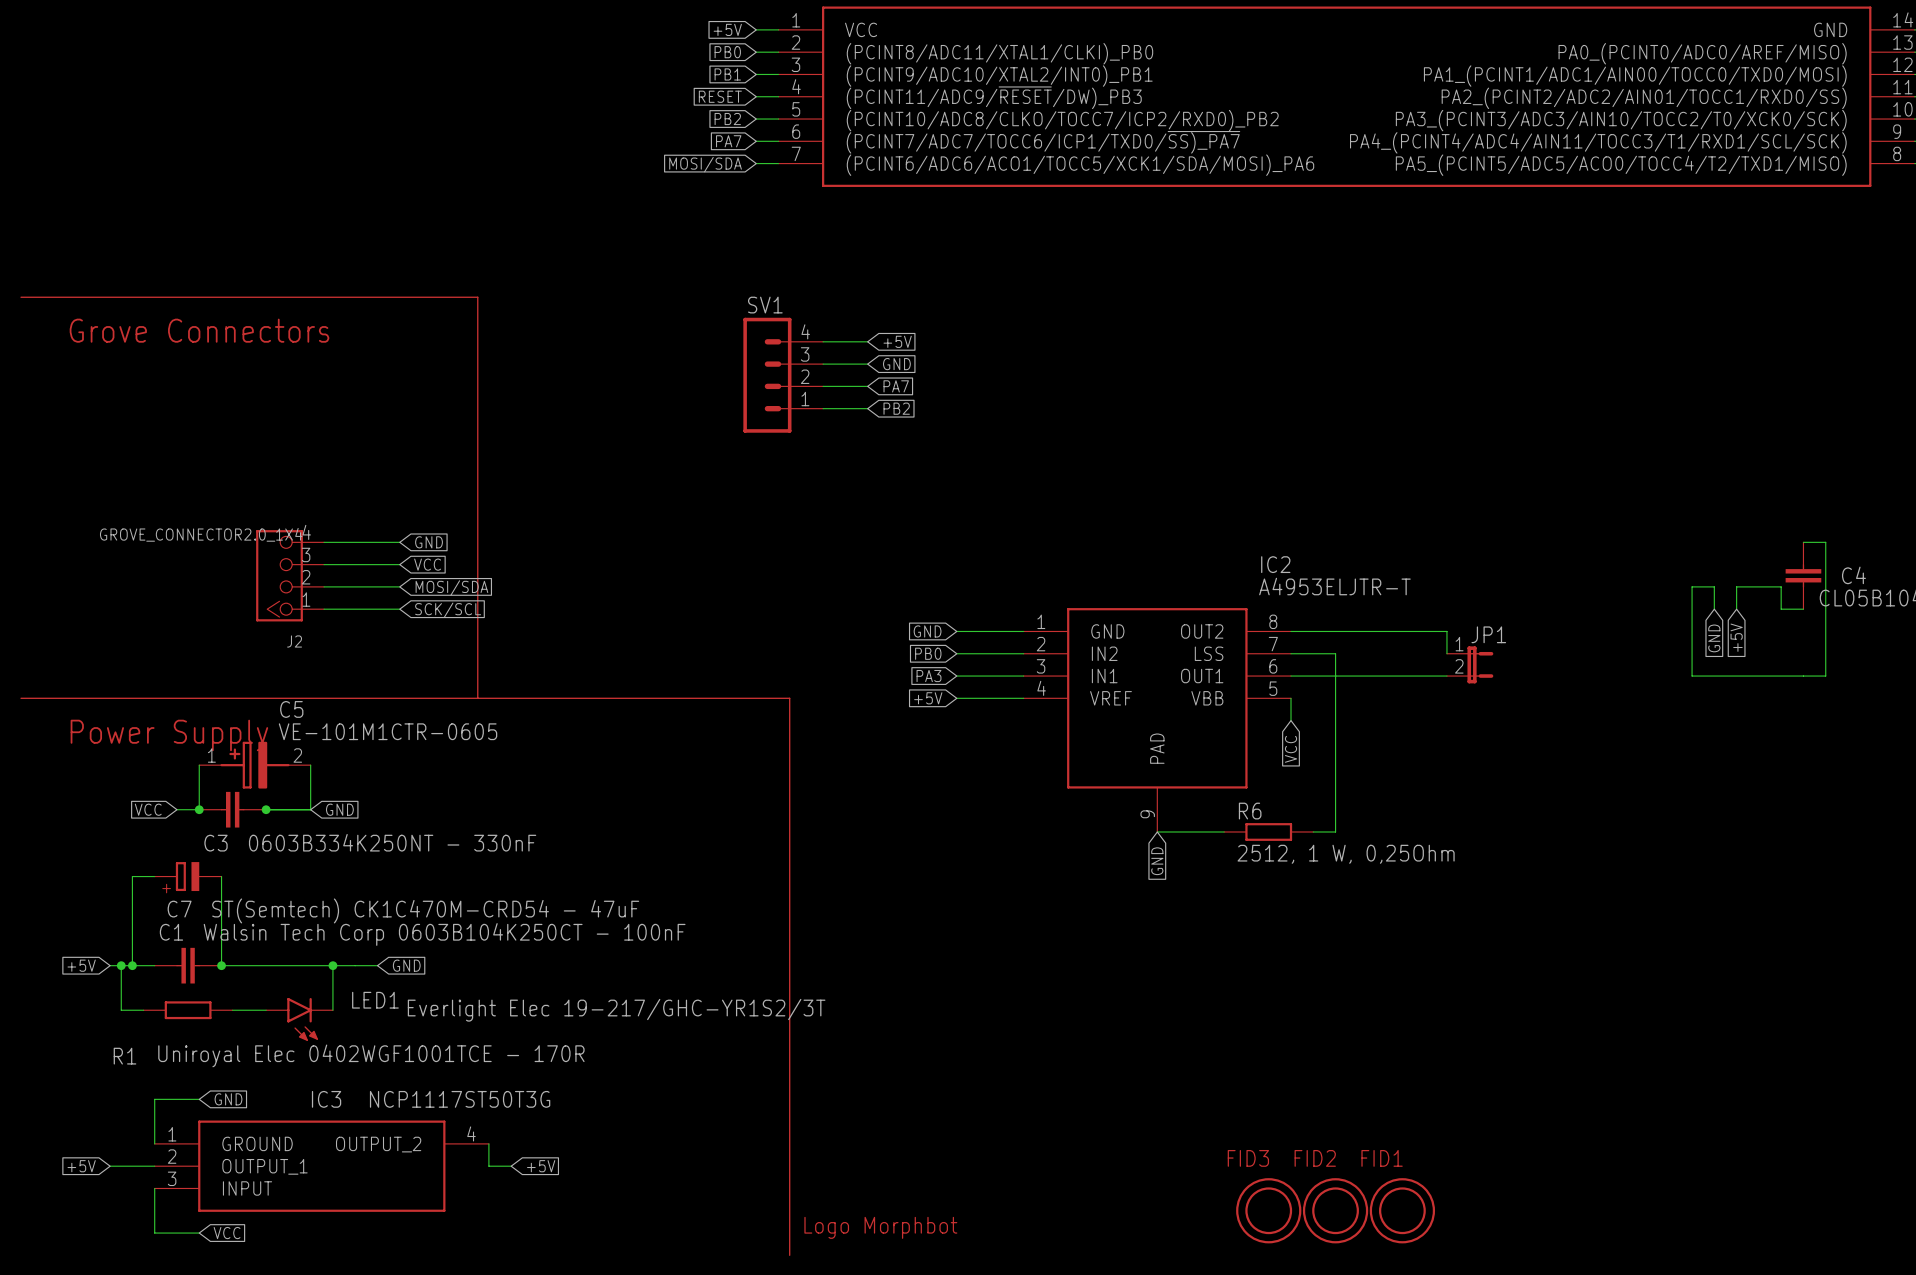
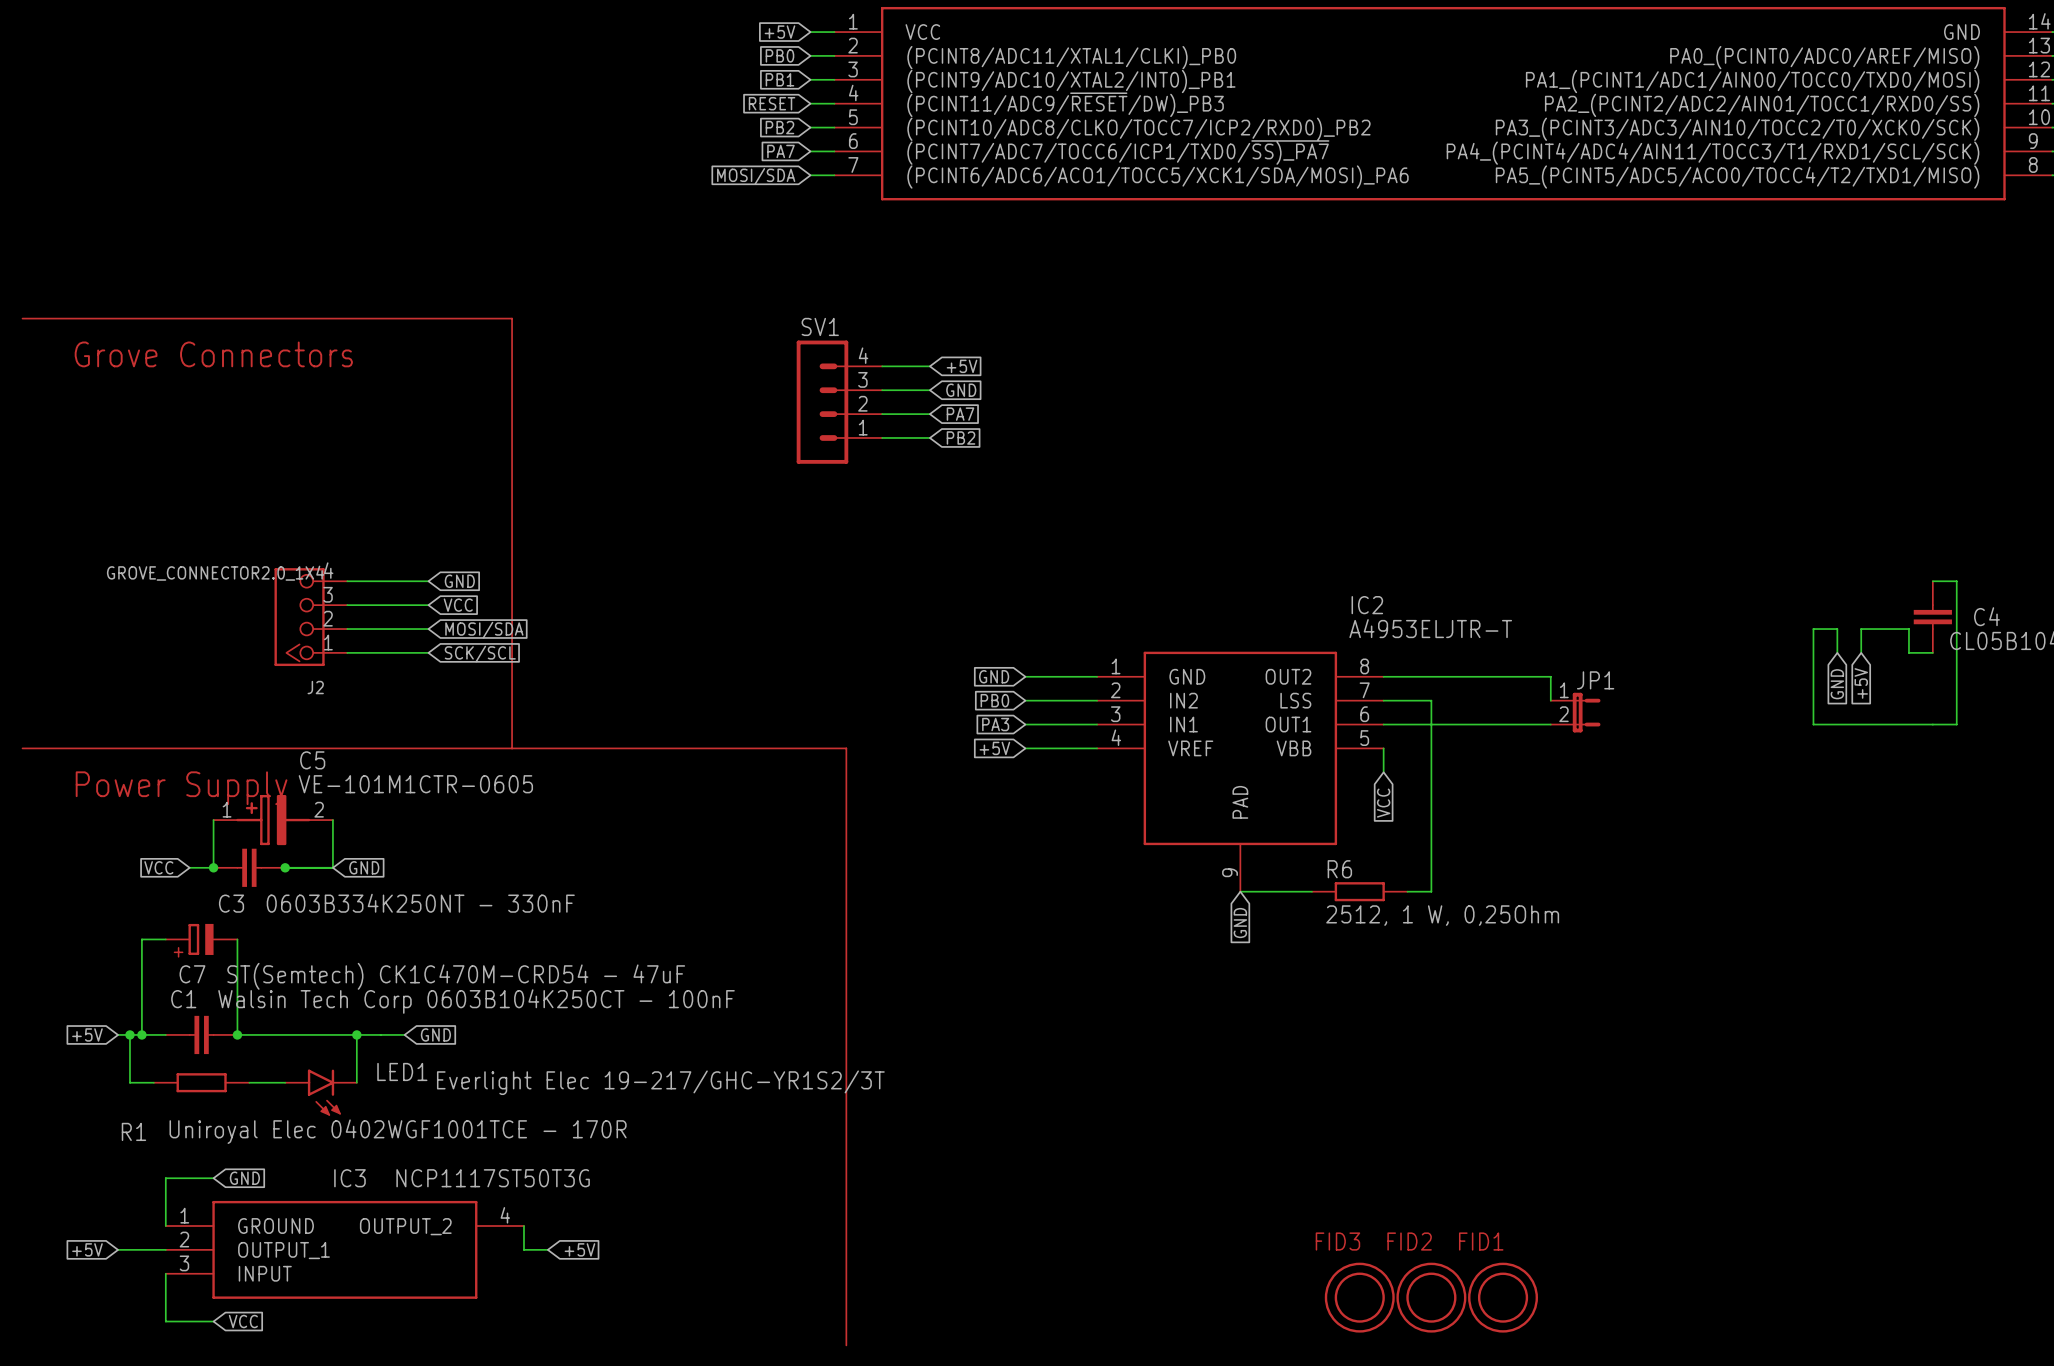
part: (880, 1227) -> none

